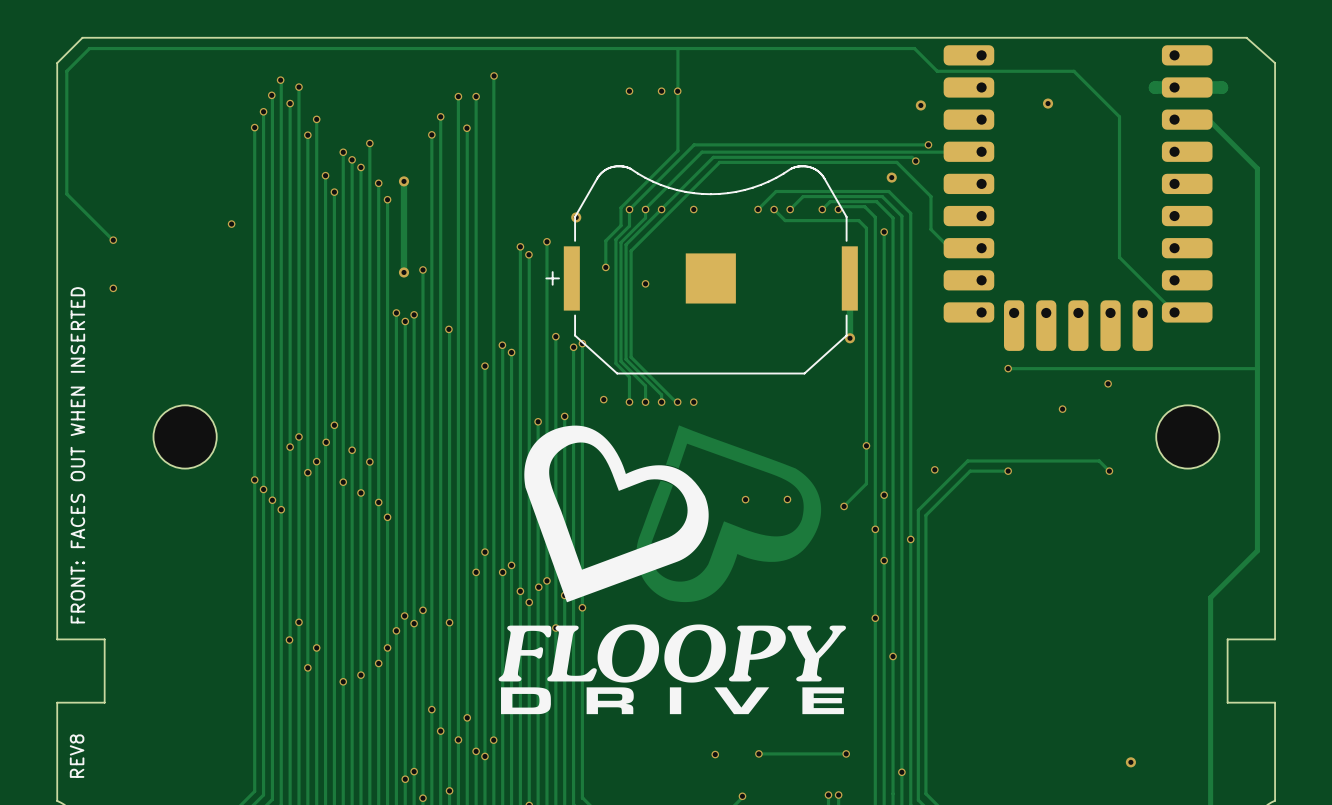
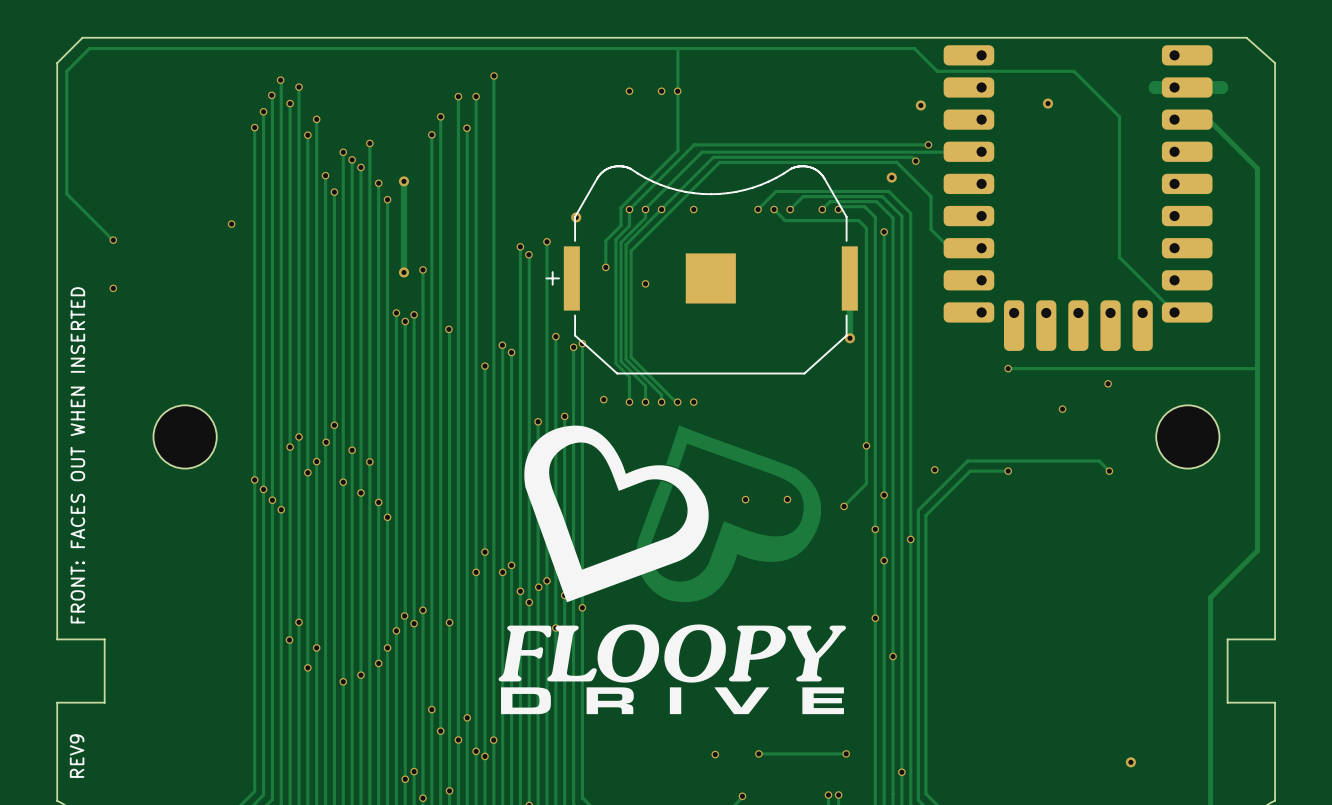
text: REV8 (77, 756) -> REV9 (77, 756)

